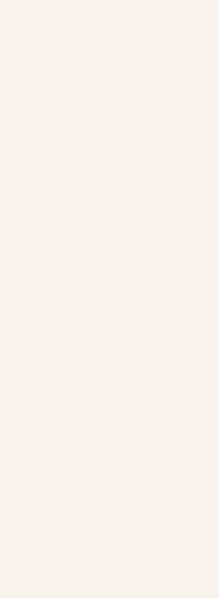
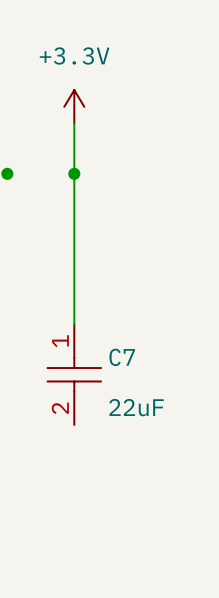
power symbol: none -> +3.3V (74, 106)
wire: none -> (74, 123) (74, 324)
junction: none -> (7, 173)
junction: none -> (74, 173)
C7: none -> 22uF (74, 374)

